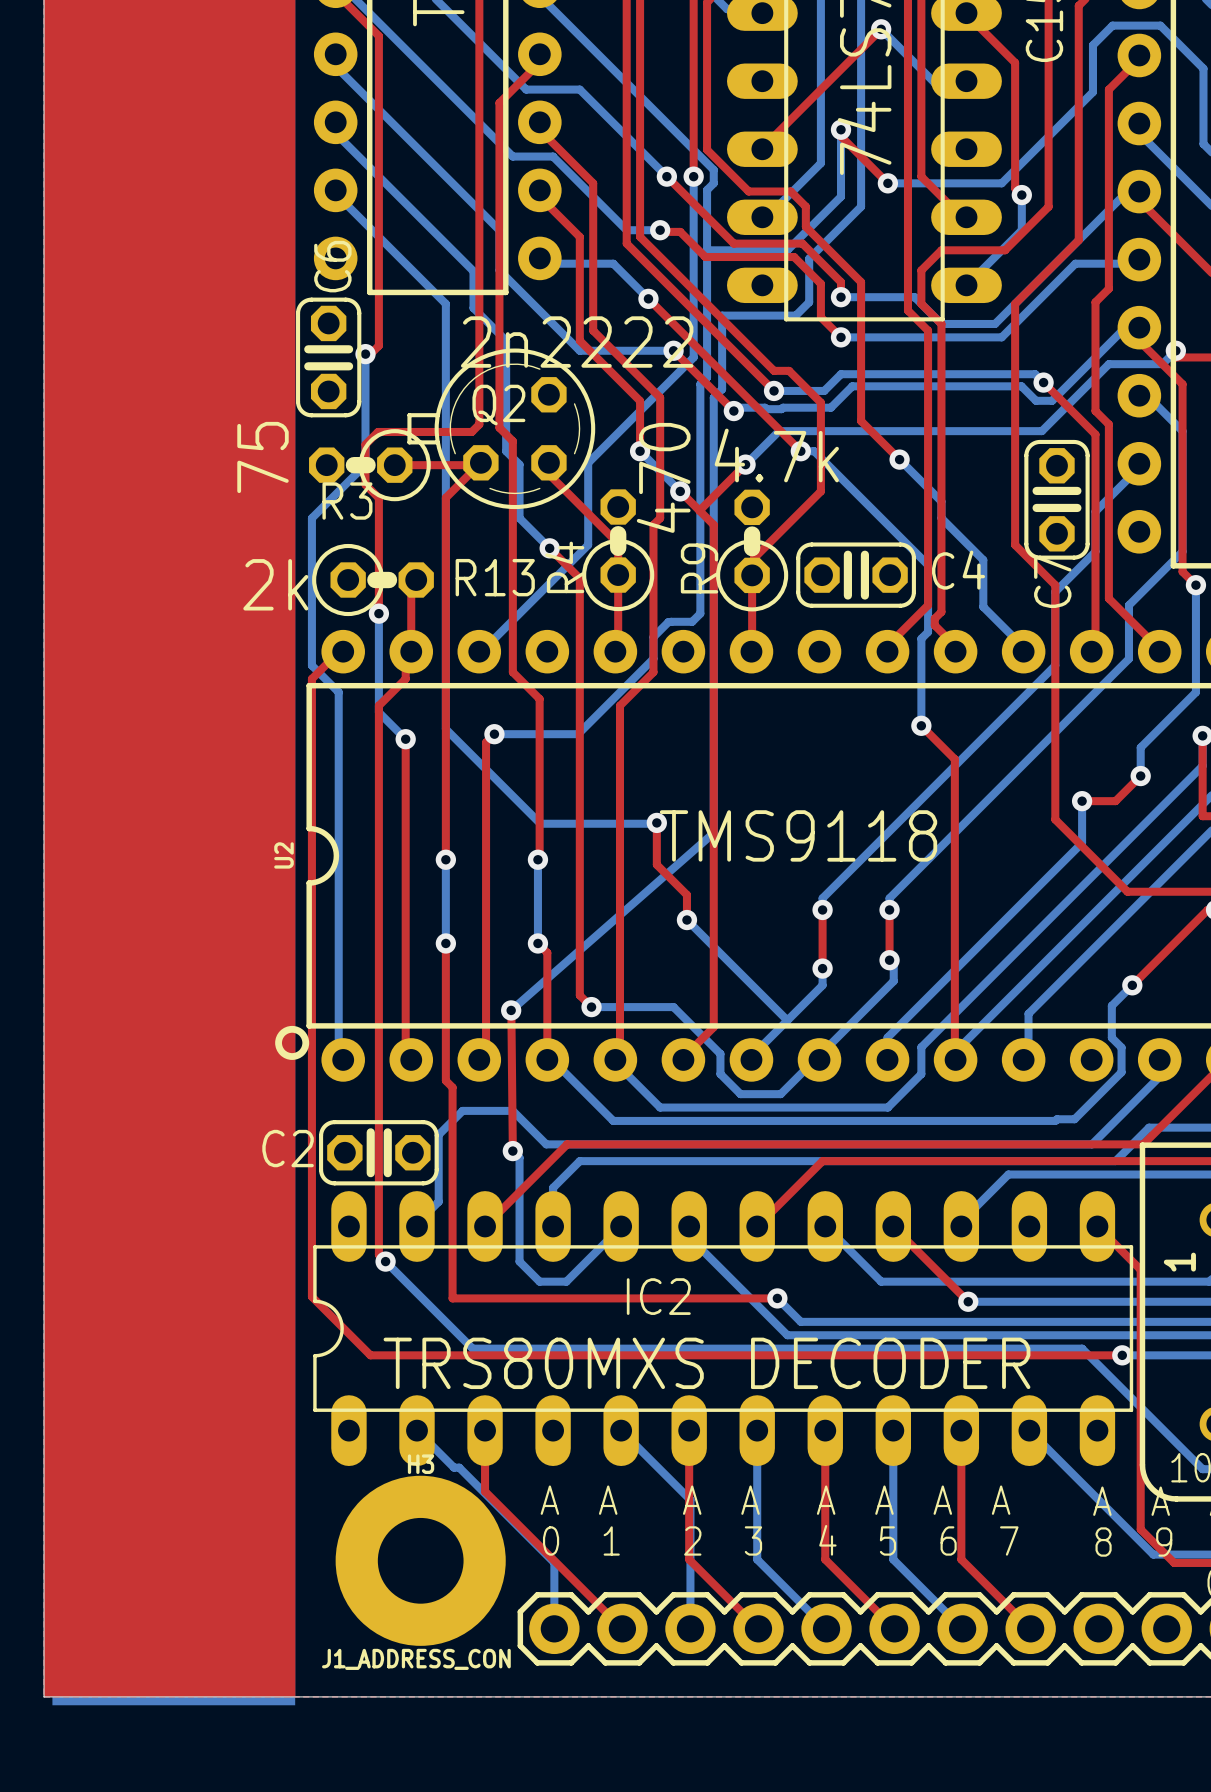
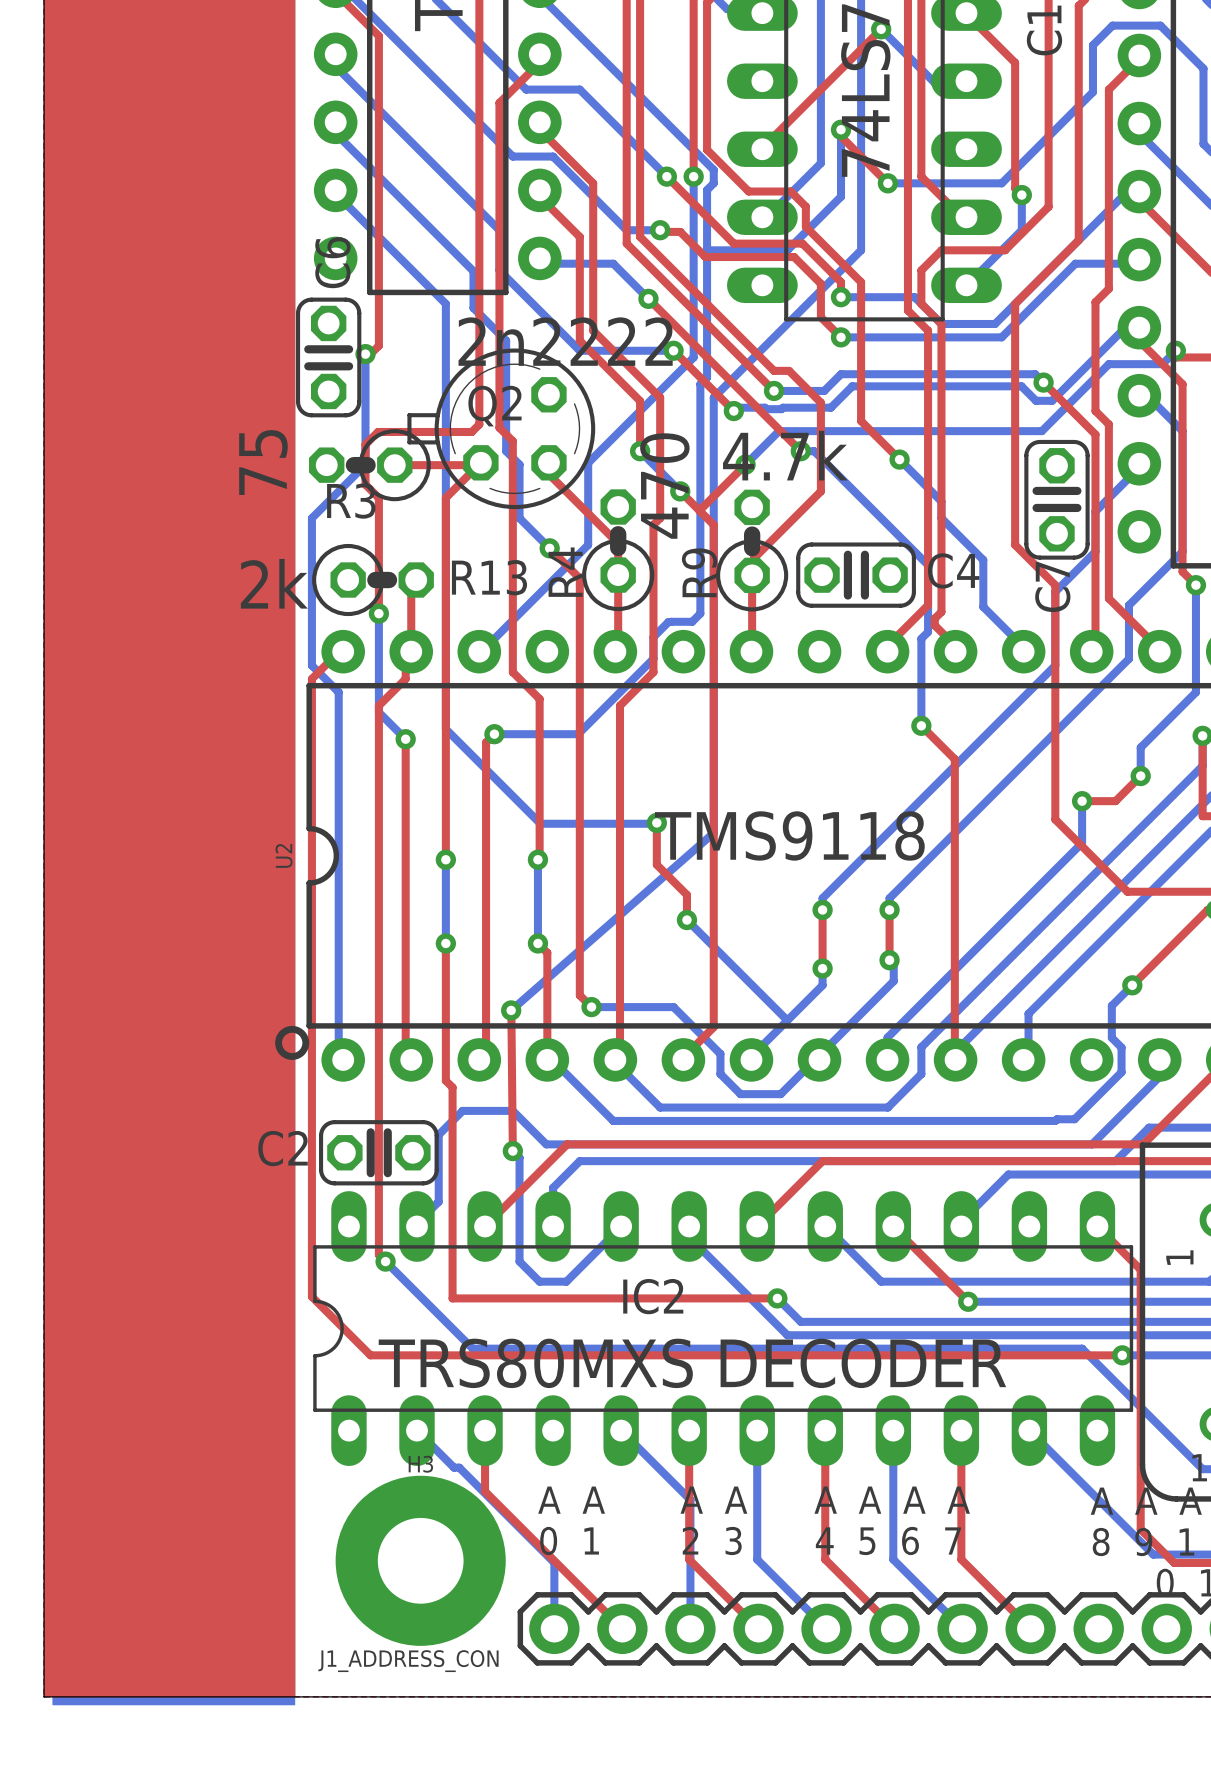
bottom track: (861, 206) (809, 258) (809, 302) -> (861, 206) (861, 250) (809, 302)
bottom track: (795, 315) (722, 315) (722, 389) -> (795, 315) (722, 389)

